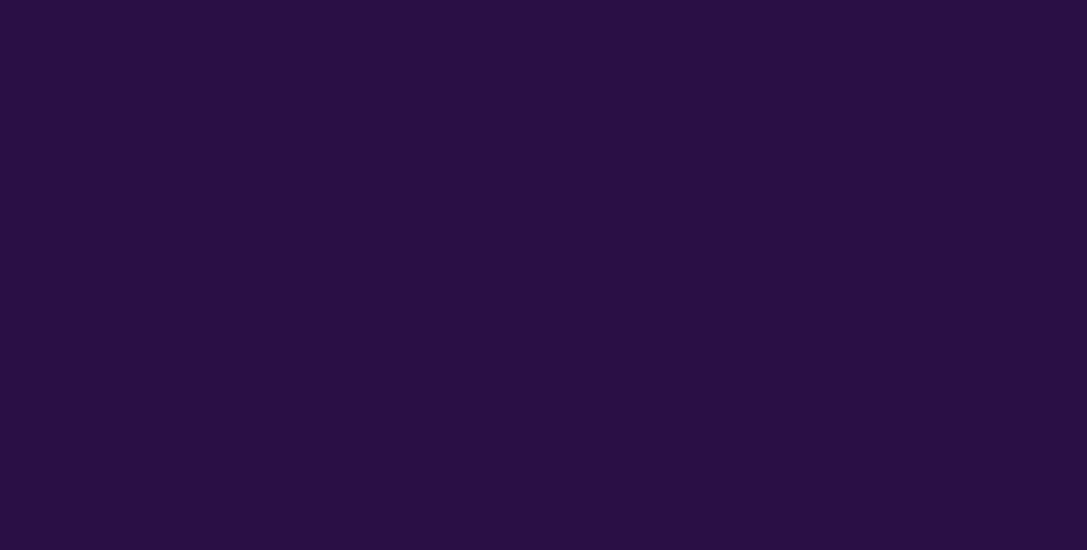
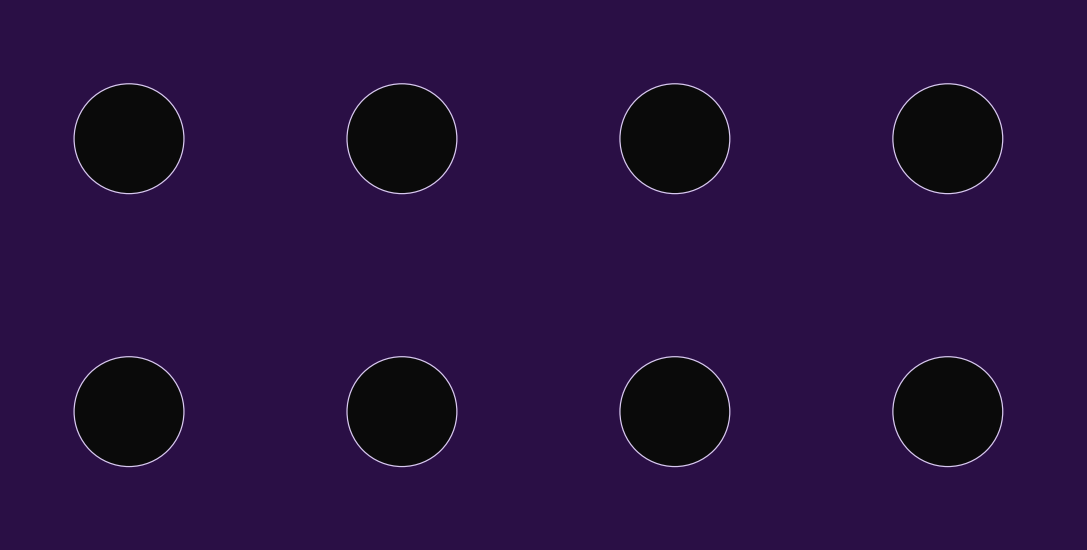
part: none -> (129, 138)
part: none -> (401, 138)
part: none -> (674, 138)
part: none -> (947, 138)
part: none -> (129, 411)
part: none -> (401, 411)
part: none -> (674, 411)
part: none -> (947, 411)

